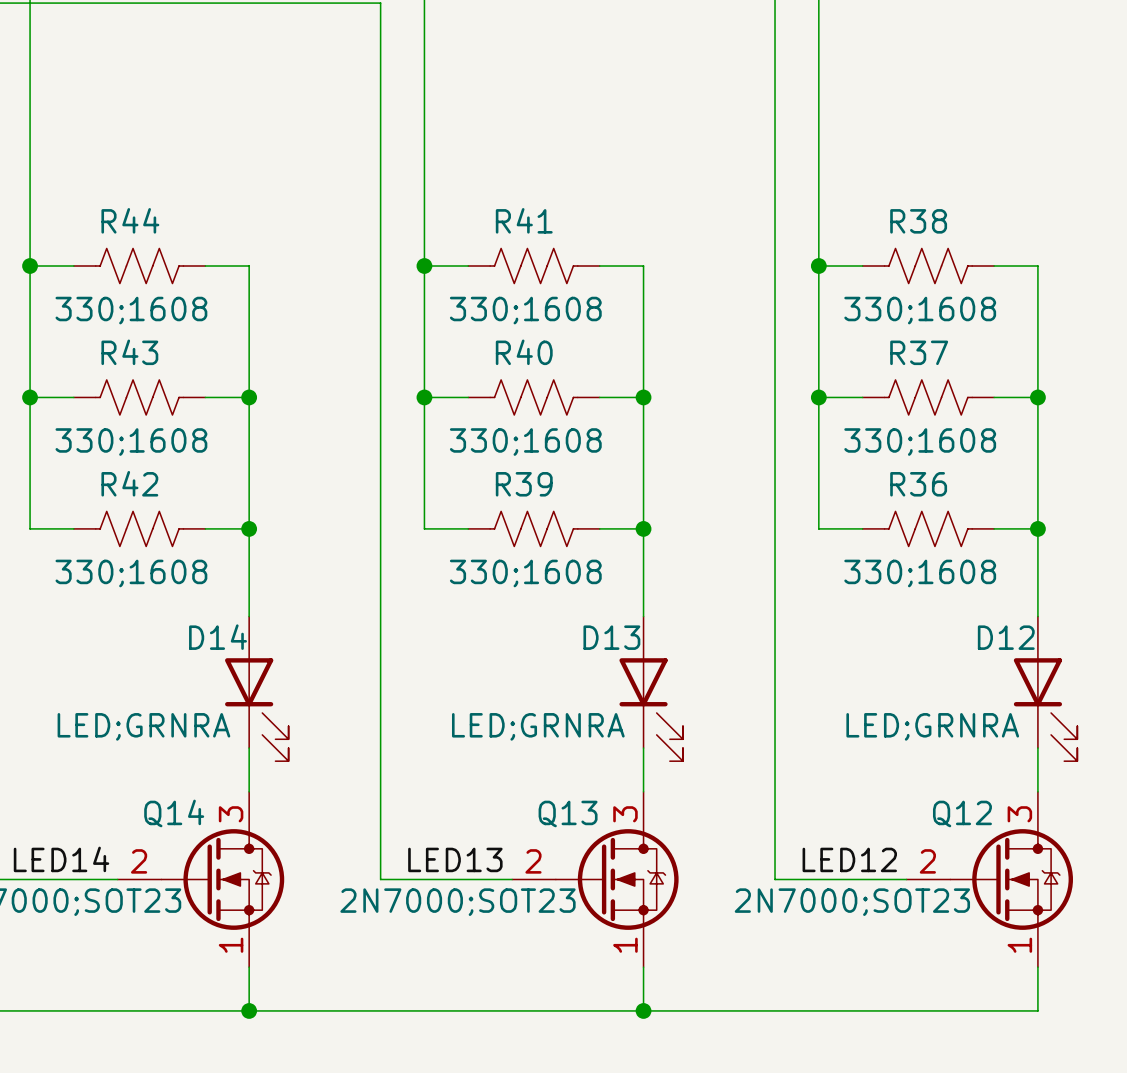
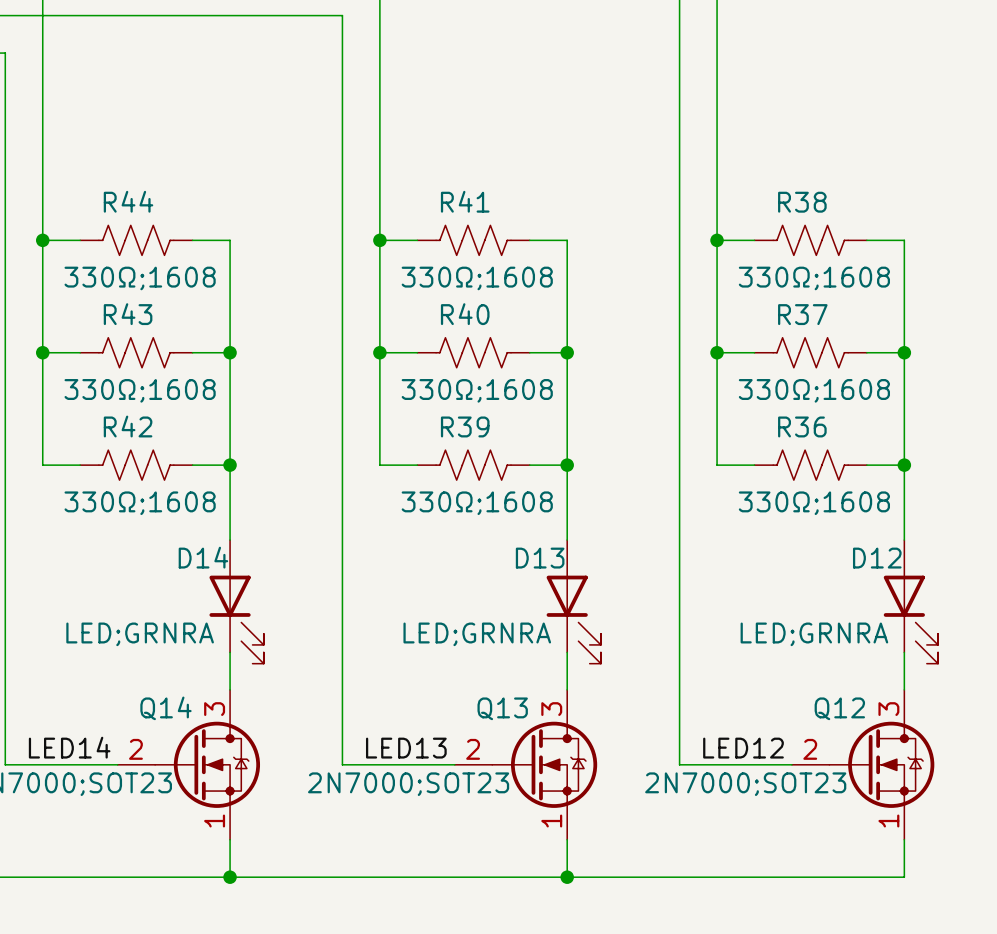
R44 value: 330;1608 (131, 310) -> 330Ω;1608 (140, 278)
R41 value: 330;1608 (525, 310) -> 330Ω;1608 (477, 278)
R38 value: 330;1608 (920, 310) -> 330Ω;1608 (814, 278)
R43 value: 330;1608 (131, 442) -> 330Ω;1608 (140, 390)
R40 value: 330;1608 (525, 442) -> 330Ω;1608 (477, 390)
R37 value: 330;1608 (920, 442) -> 330Ω;1608 (814, 390)
R42 value: 330;1608 (131, 573) -> 330Ω;1608 (140, 503)
R39 value: 330;1608 (525, 573) -> 330Ω;1608 (477, 503)
R36 value: 330;1608 (920, 573) -> 330Ω;1608 (814, 503)

